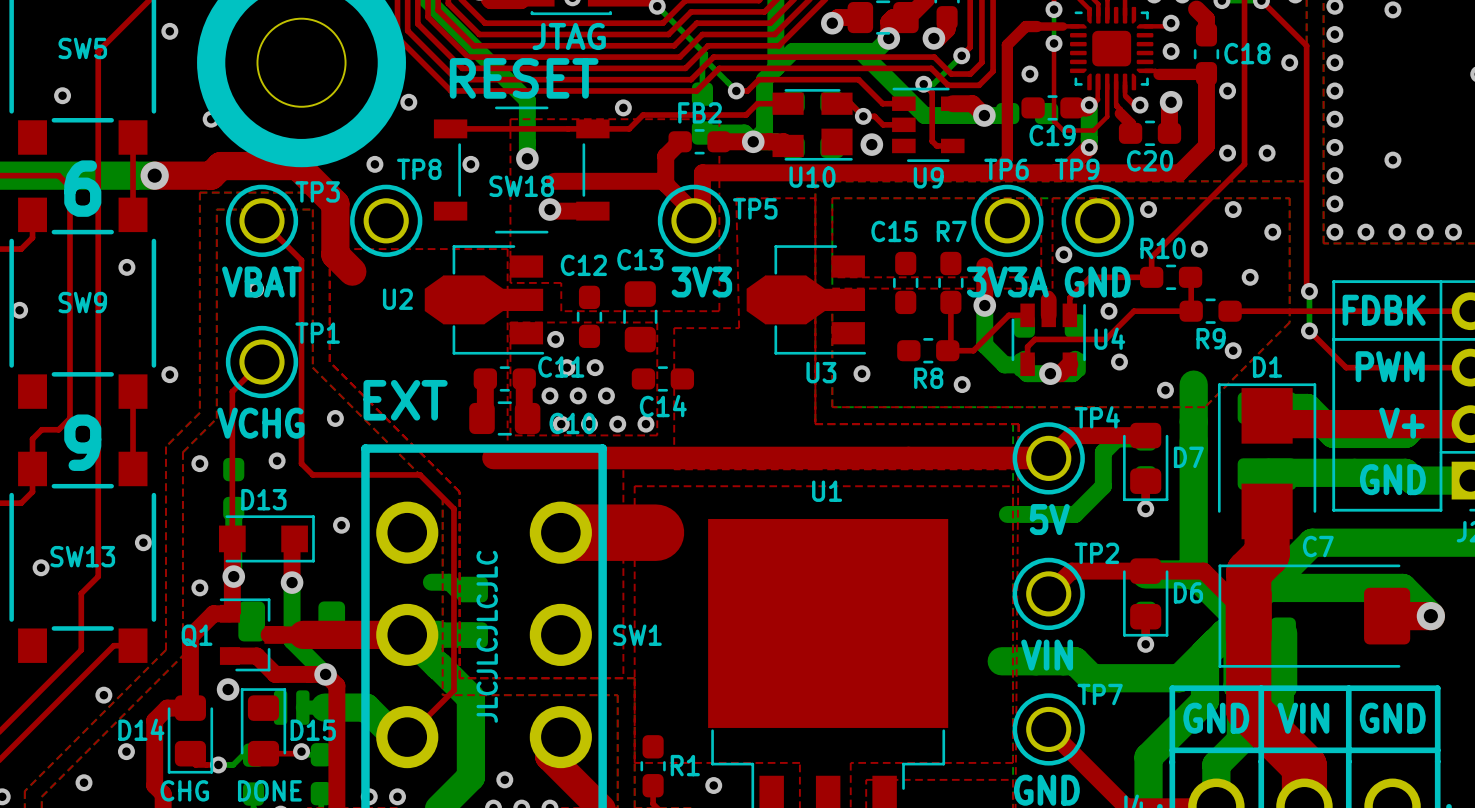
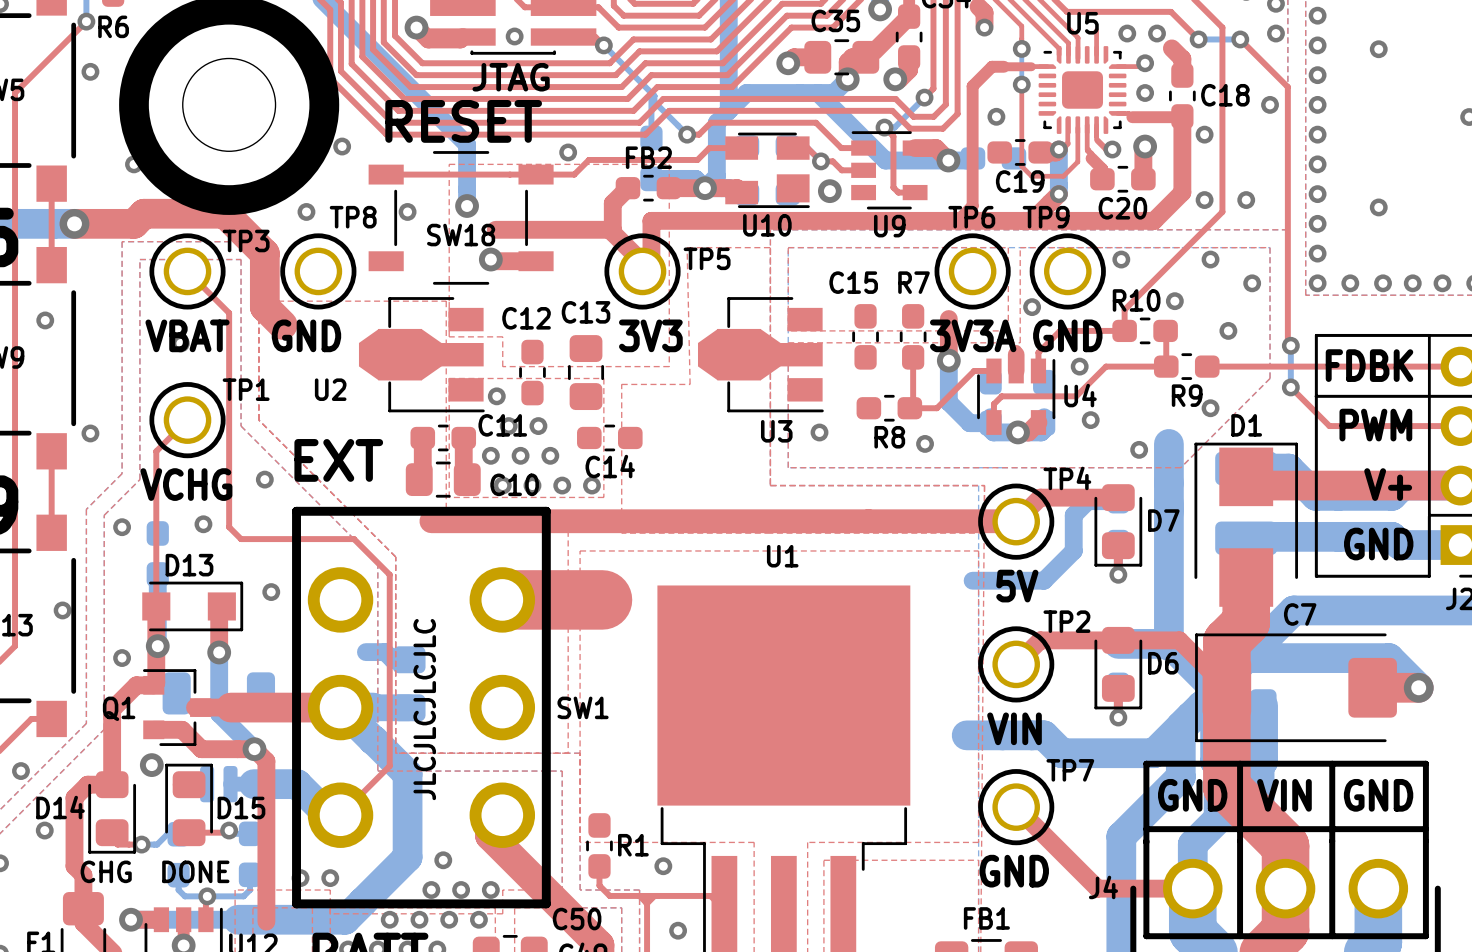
text: none -> GND (306, 335)
U2 name position: U2 (397, 299) -> U2 (330, 389)

